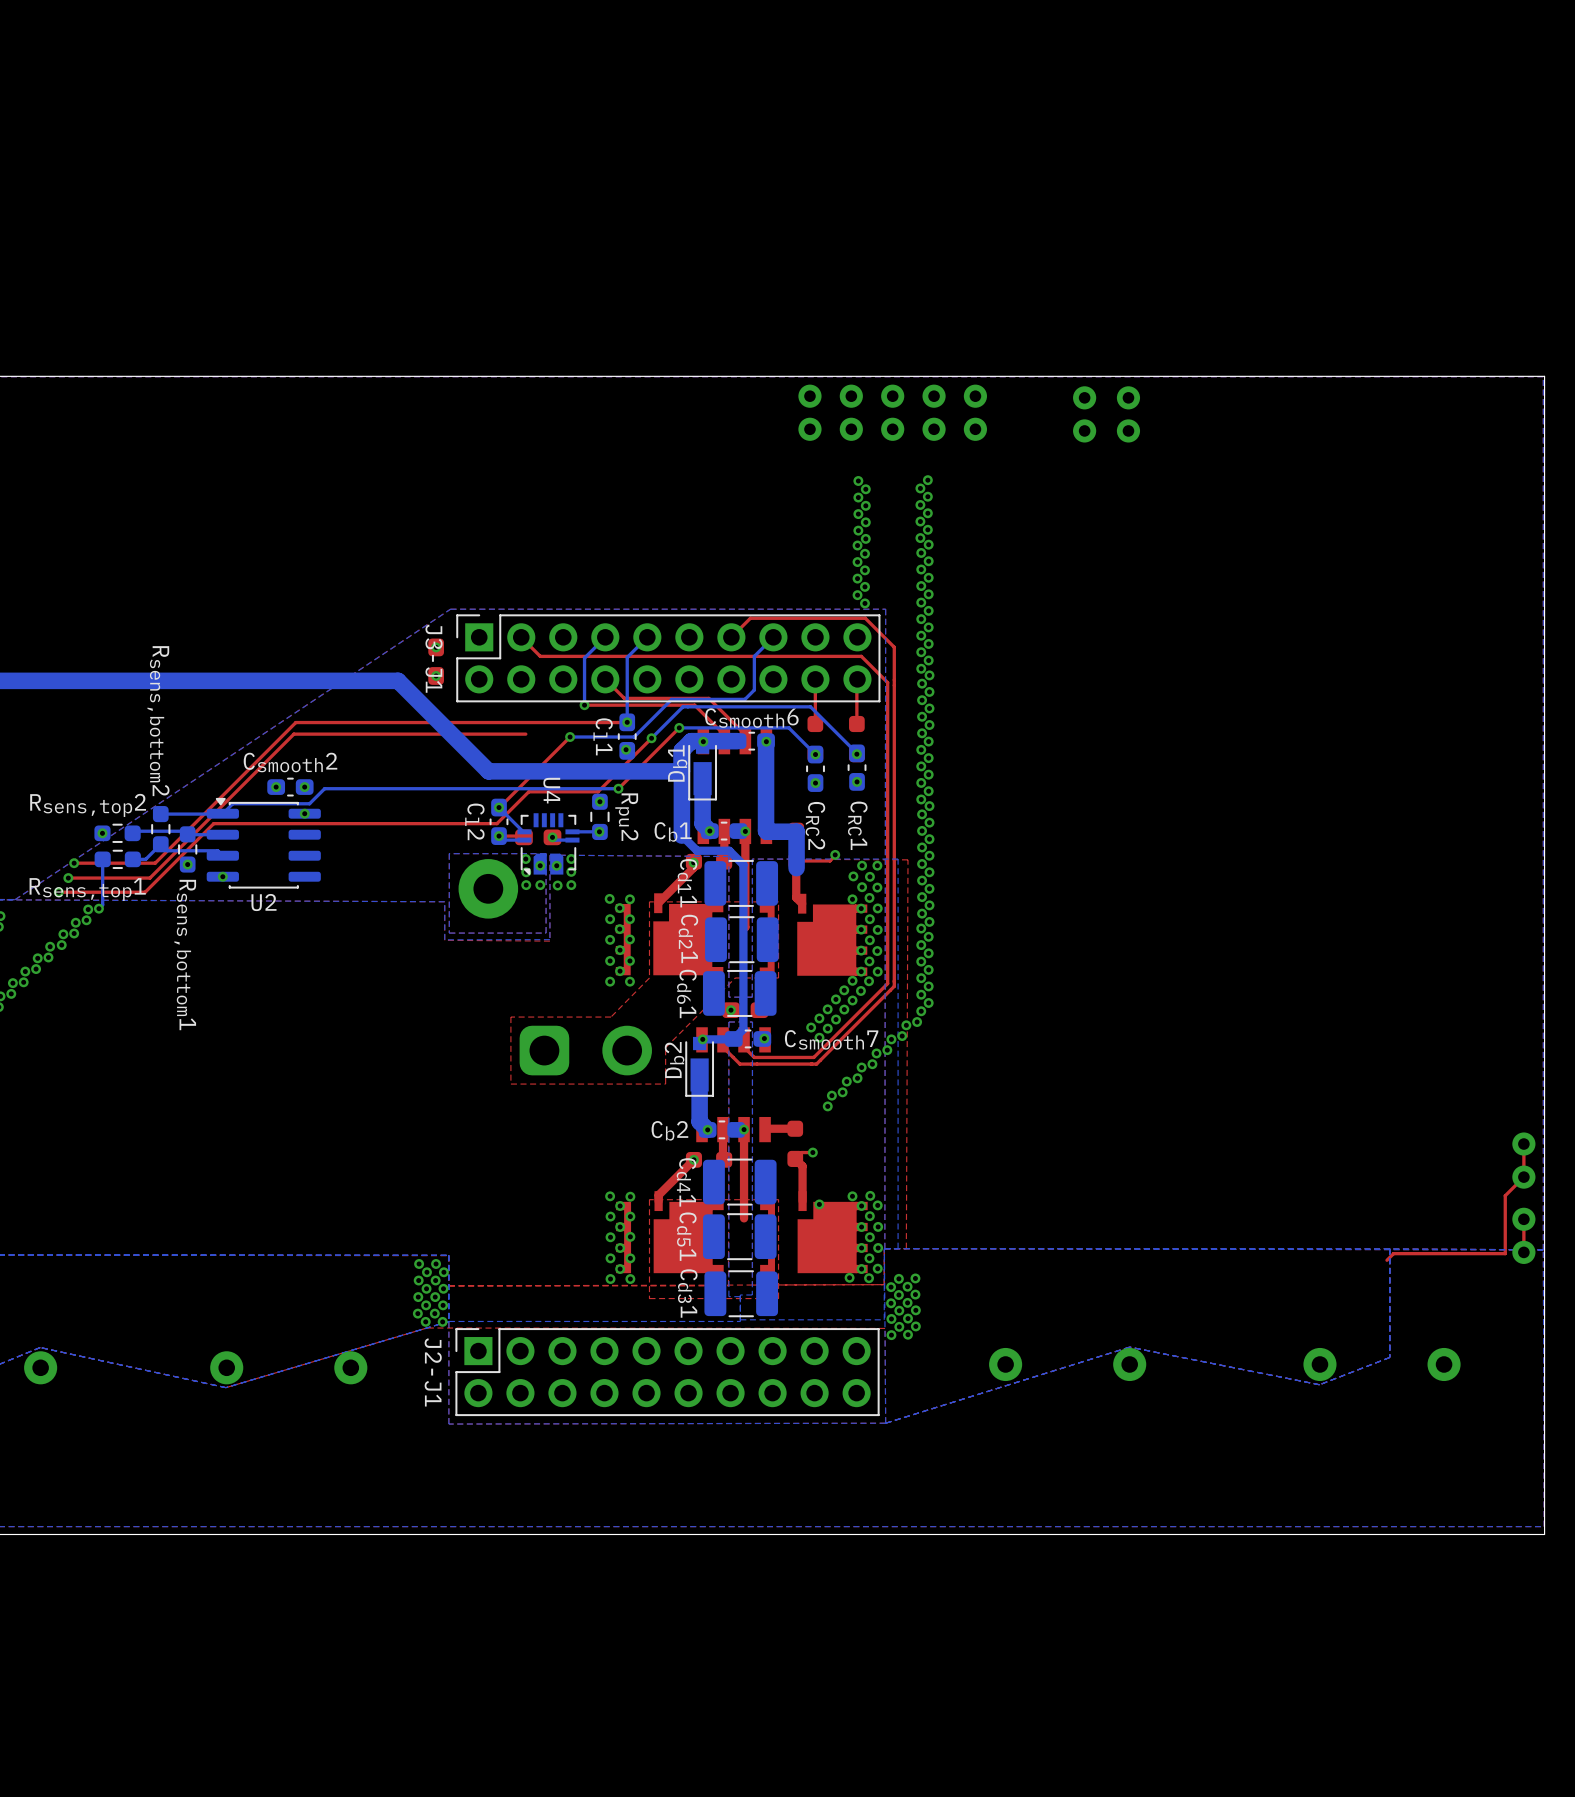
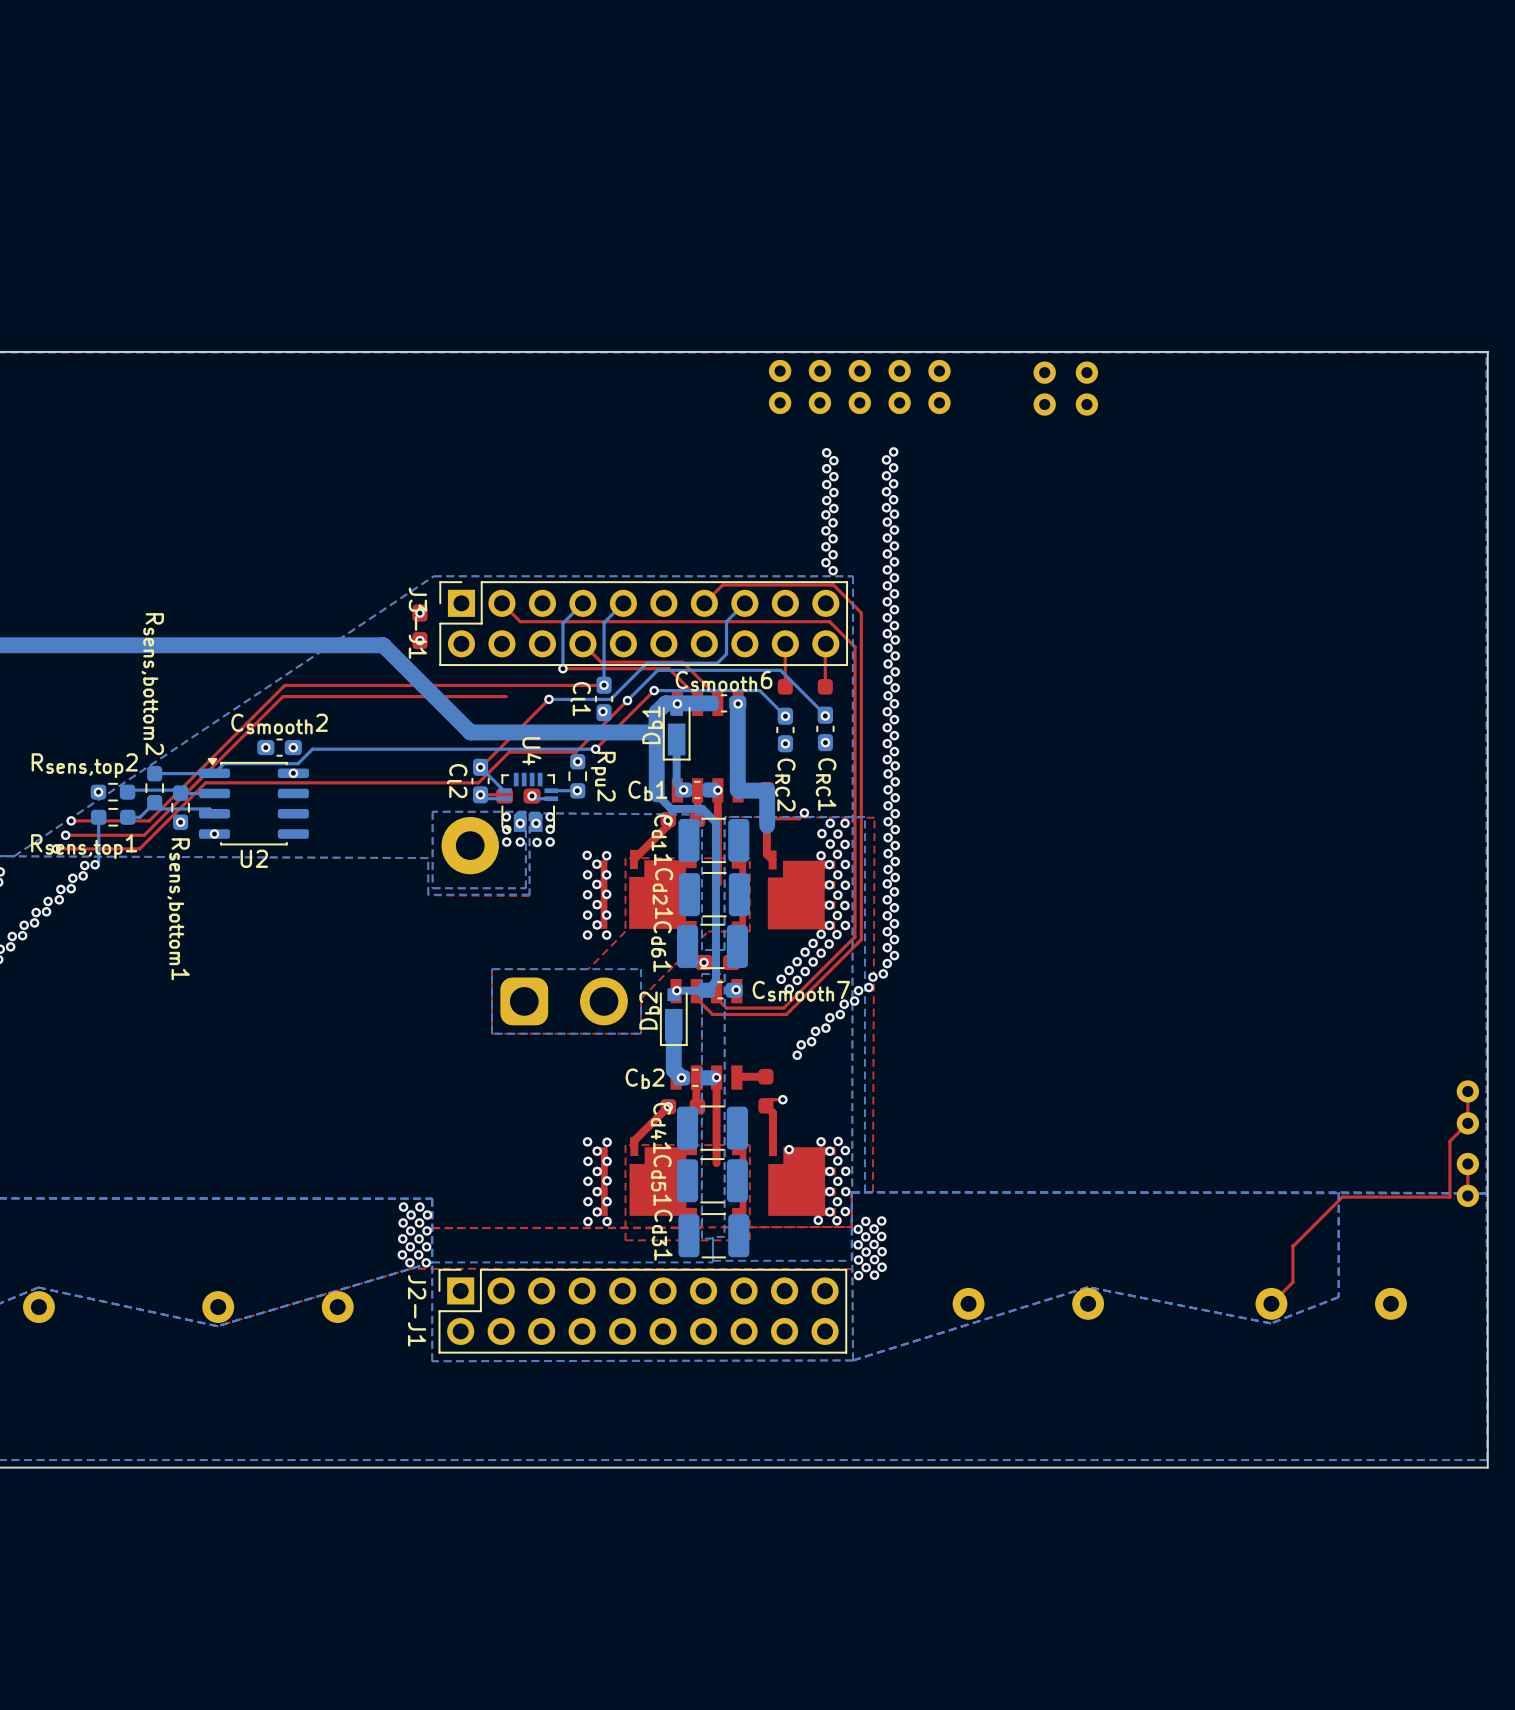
bottom track width: thick (702, 778) (702, 823) (709, 831) -> thin (676, 739) (676, 783) (683, 789)
bottom zone outline: none -> (641, 969) (492, 969) (492, 1033) (641, 1033) (641, 969)
top track: none -> (1335, 1203) (1292, 1245) (1292, 1282) (1271, 1303)

